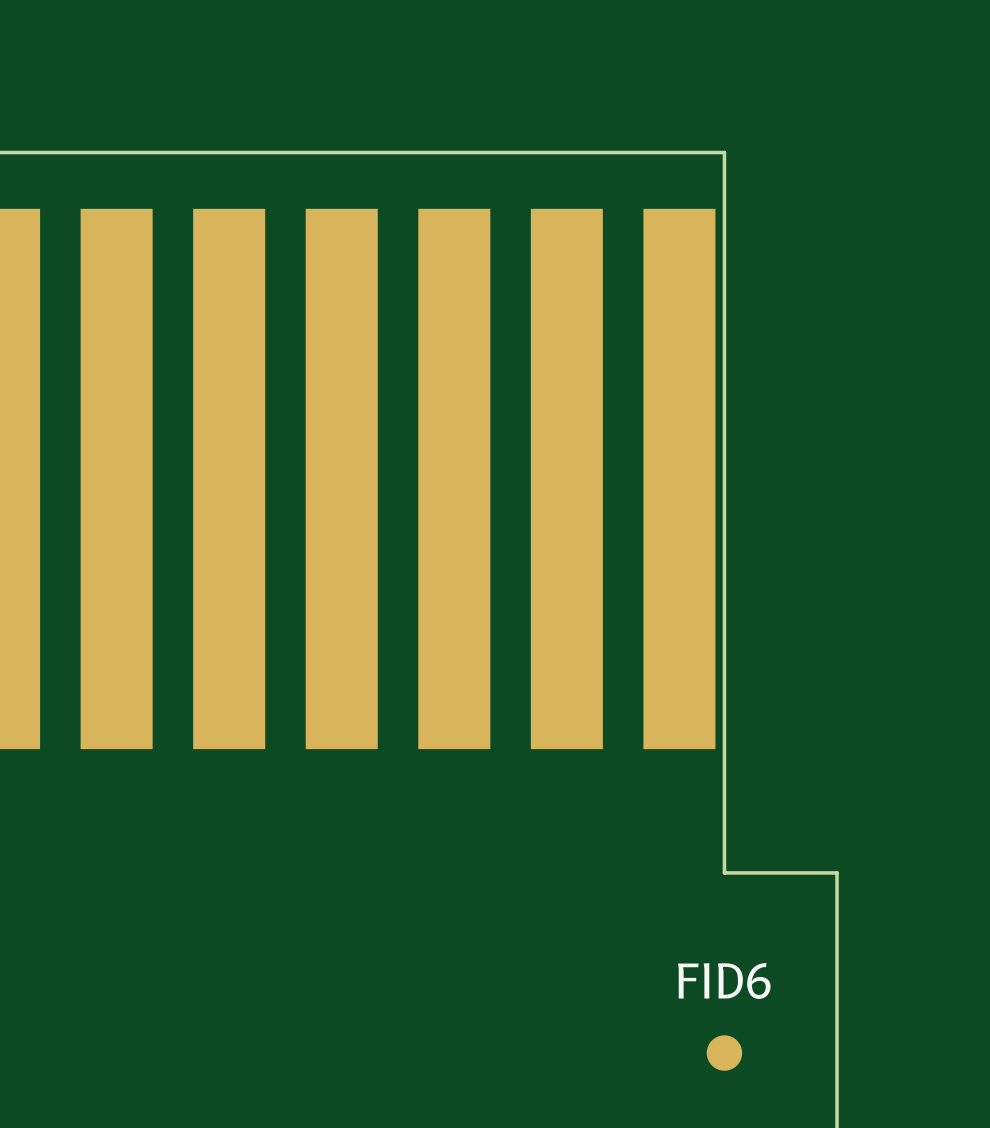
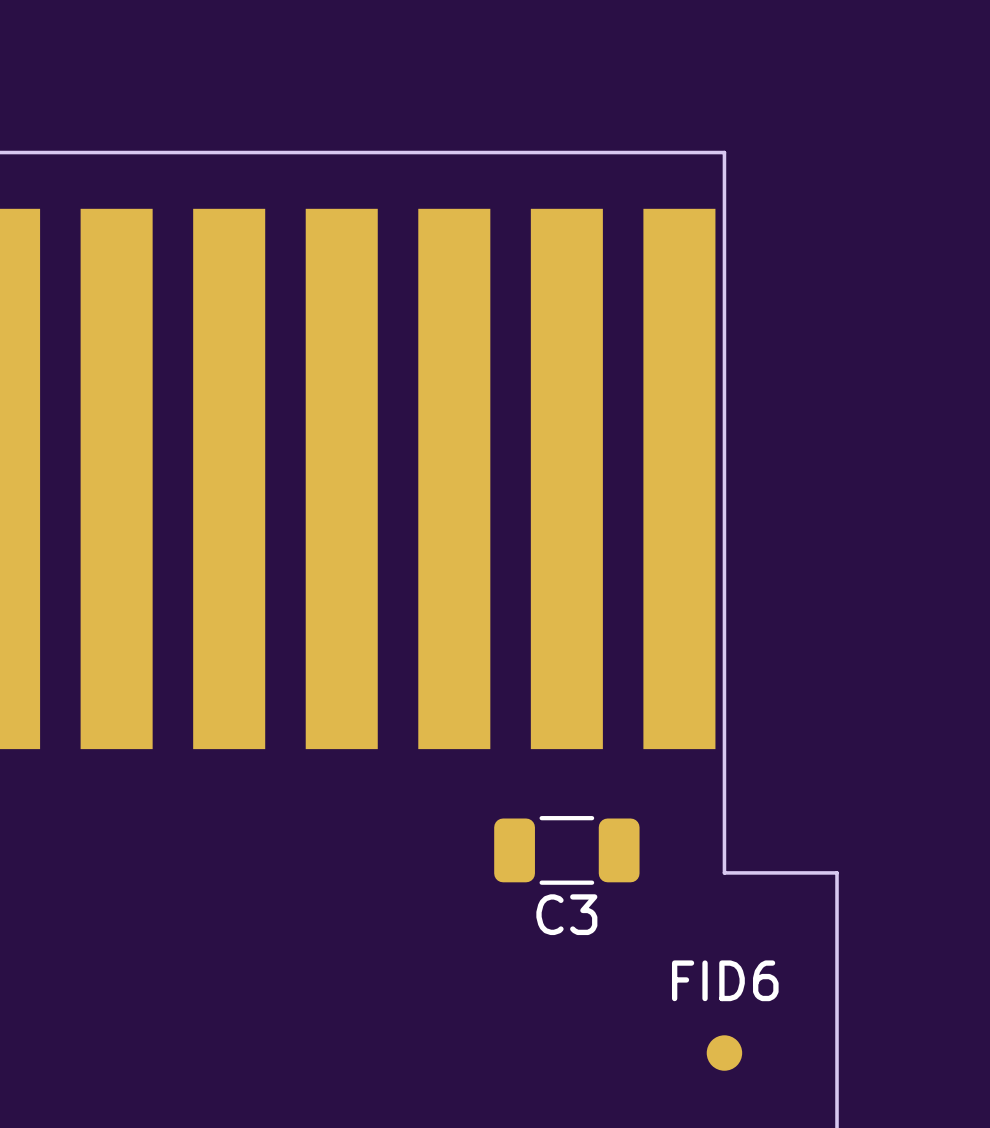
C3: none -> (566, 850)

